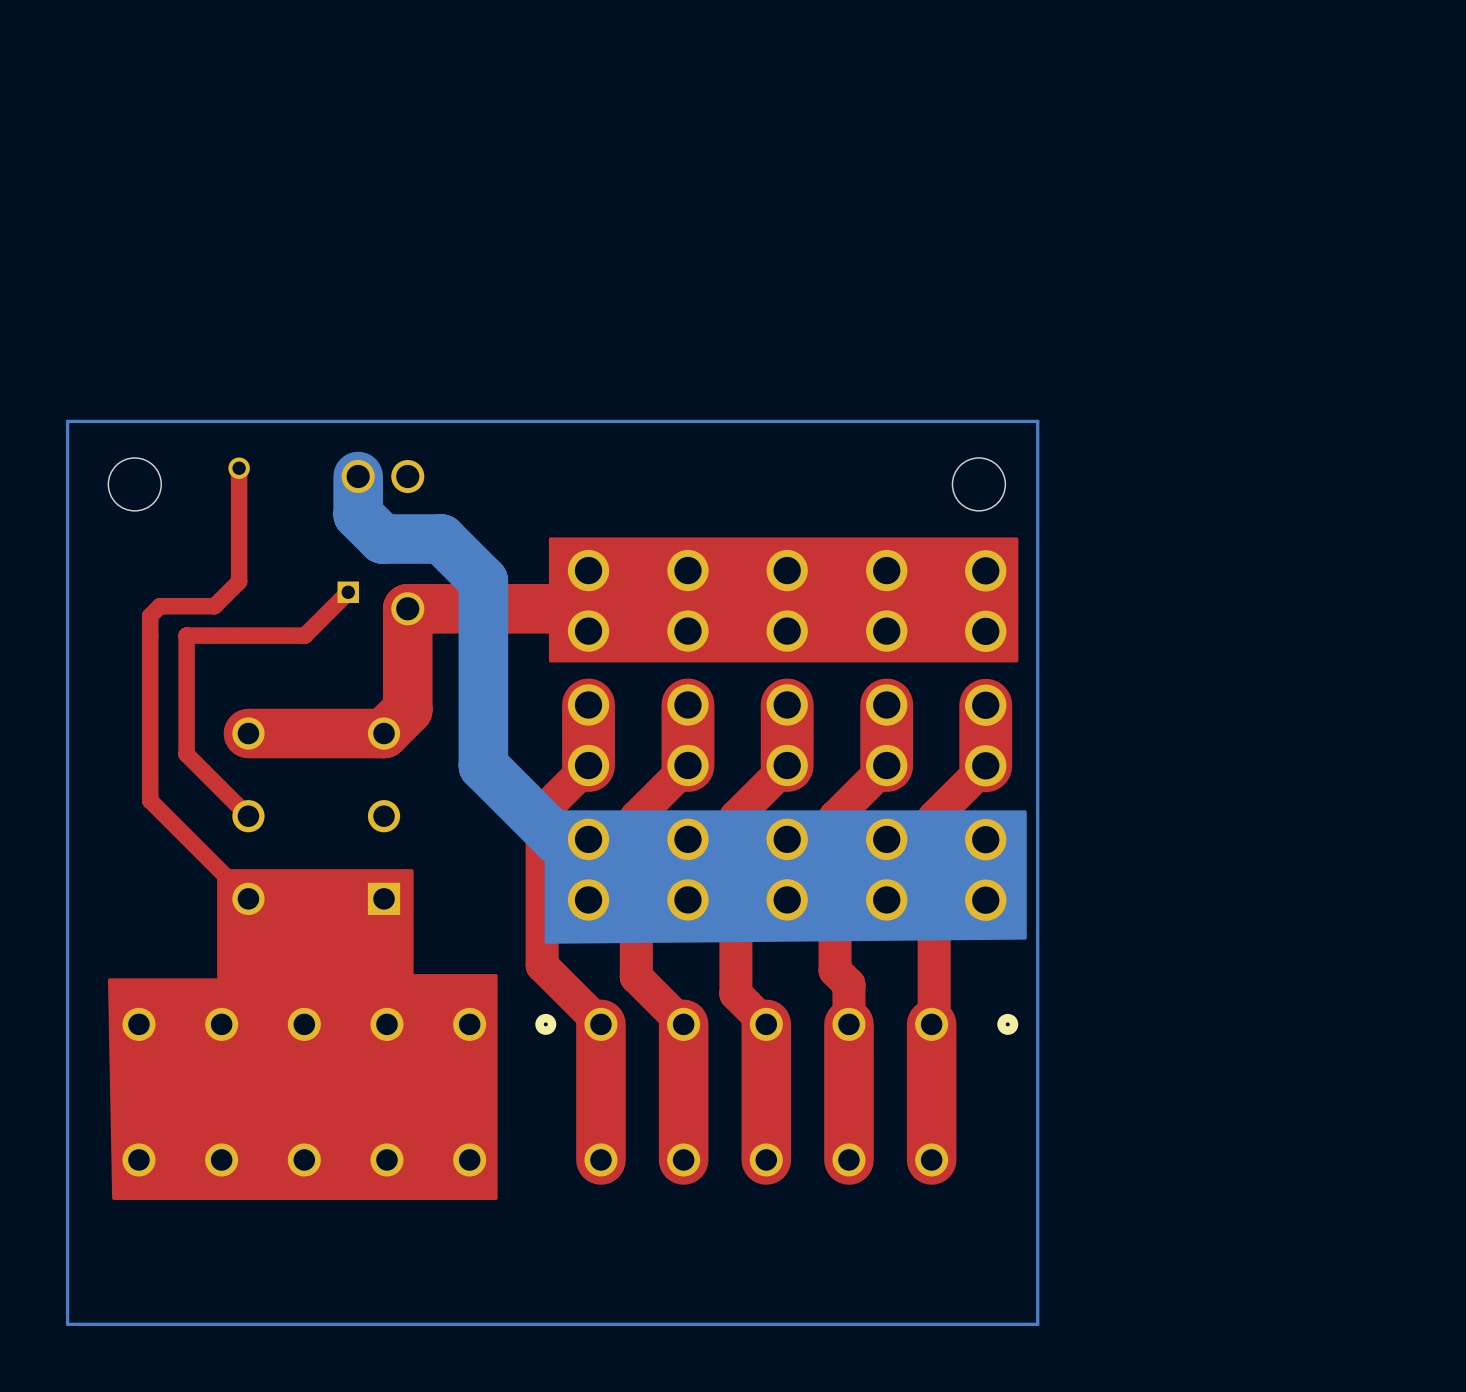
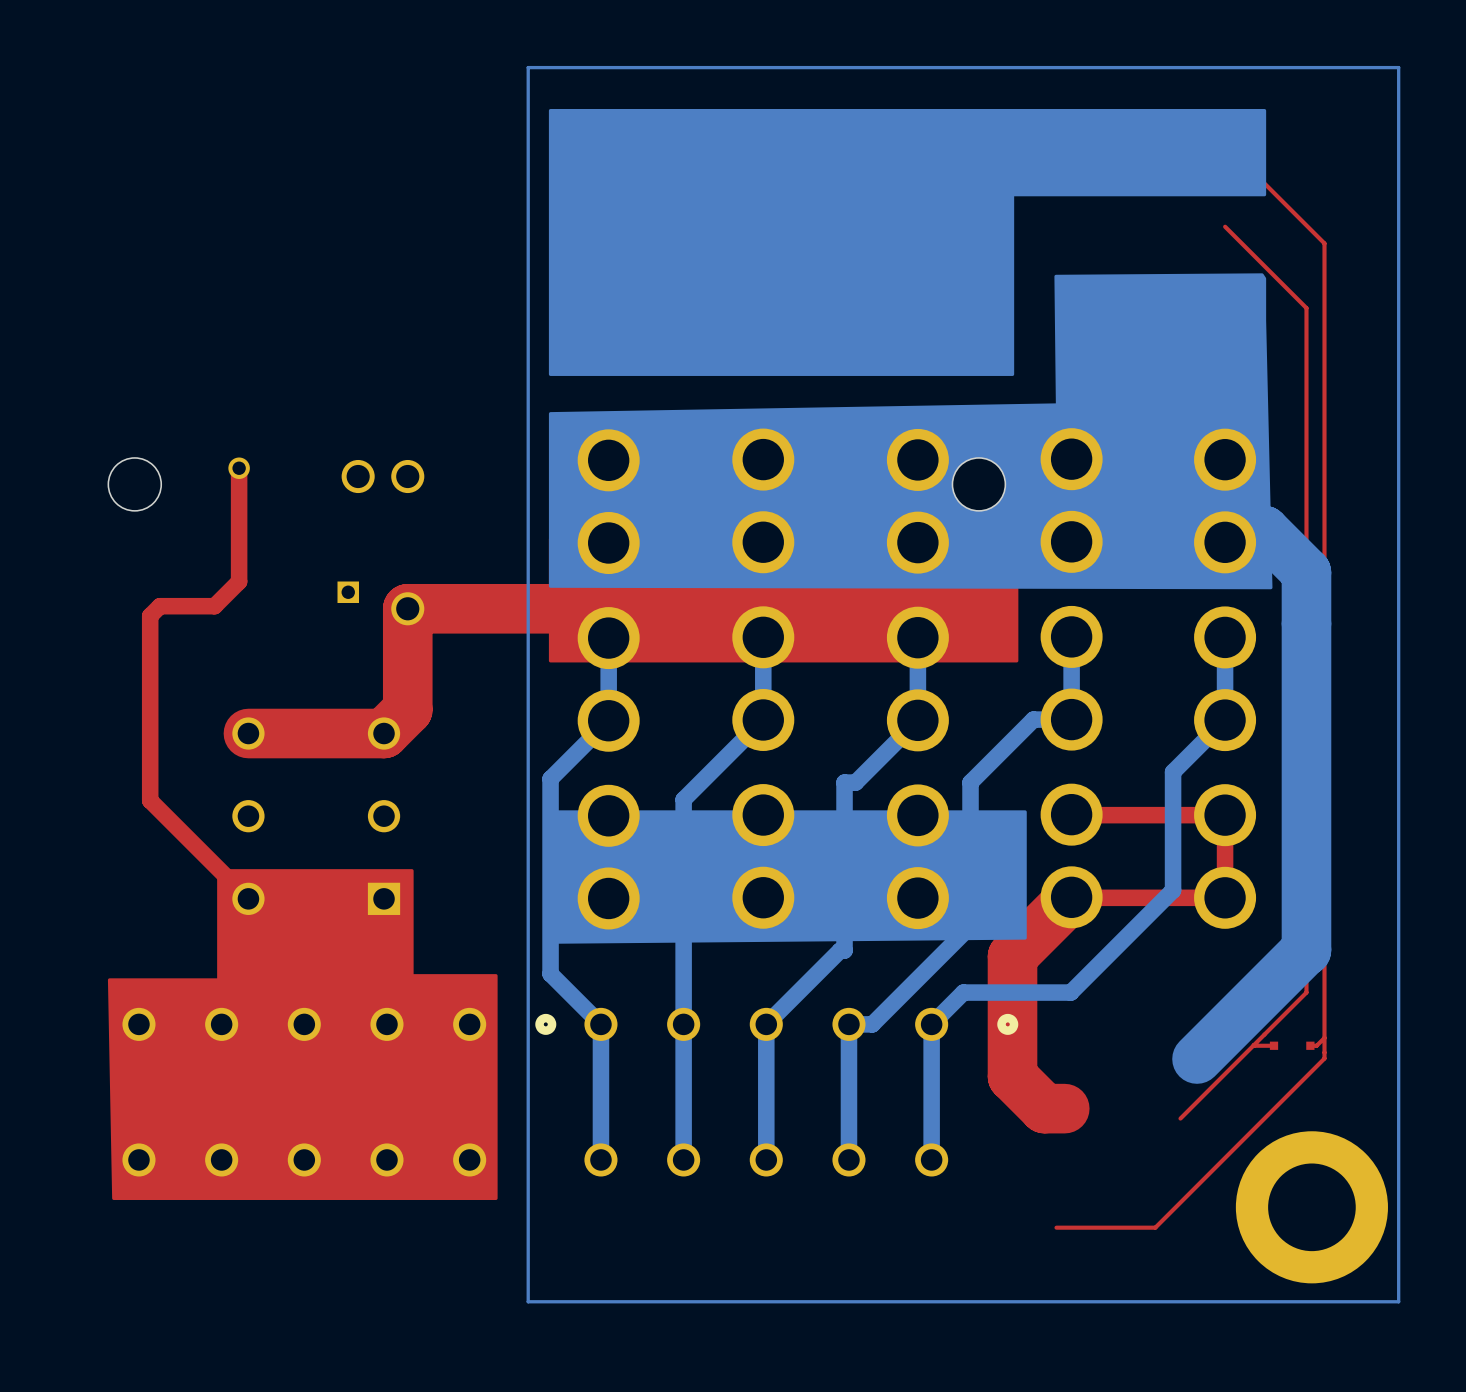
bottom track: none -> (1398, 67) (528, 67) (528, 1301) (1398, 1301) (1398, 67)
drawing: none -> [548, 108, 1273, 590]
top track: none -> (1225, 144) (1324, 243) (1324, 1058) (1155, 1227) (1056, 1227)
top track: none -> (1225, 226) (1306, 308) (1306, 992) (1180, 1118)
bottom track: (1037, 421) (67, 421) (67, 1324) (1037, 1324) (1037, 421) -> none
bottom track: (358, 476) (358, 514) (382, 539) (441, 539) (483, 581) (483, 765) (556, 839) (886, 839) -> none
bottom track: none -> (1225, 542) (1236, 530) (1264, 530) (1306, 572) (1306, 950)
top track: (348, 592) (304, 635) (186, 635) (186, 754) (248, 816) -> none
bottom track: none -> (1301, 619) (1306, 623) (1306, 949) (1197, 1059)
bottom track: none -> (1071, 636) (1071, 719) (1033, 719) (970, 782) (970, 926) (872, 1024) (848, 1024) (848, 1159)
bottom track: none -> (763, 637) (763, 719) (683, 799) (683, 1159)
bottom track: none -> (917, 637) (917, 720) (855, 782) (844, 782) (844, 950) (840, 950) (766, 1024) (766, 1159)
bottom track: none -> (1225, 637) (1225, 720) (1173, 772) (1173, 890) (1070, 992) (963, 992) (931, 1024) (931, 1157)
bottom track: none -> (608, 638) (608, 720) (550, 778) (550, 973) (600, 1024) (600, 1159)
part: none -> (763, 678)
part: none -> (1071, 678)
part: none -> (1225, 678)
part: none -> (608, 679)
part: none -> (917, 679)
top track: (687, 704) (687, 765) (636, 817) (636, 977) (683, 1024) (683, 1159) -> none
top track: (787, 704) (787, 765) (735, 816) (735, 993) (766, 1024) (766, 1159) -> none
top track: (588, 705) (588, 765) (542, 811) (542, 965) (600, 1024) (600, 1159) -> none
top track: (886, 705) (886, 765) (835, 817) (835, 970) (848, 984) (848, 1159) -> none
top track: (985, 705) (985, 765) (934, 817) (934, 1021) (931, 1024) (931, 1159) -> none
part: (588, 735) -> none
part: (687, 735) -> none
part: (787, 735) -> none
part: (886, 735) -> none
part: (985, 735) -> none
top track: none -> (1071, 814) (1225, 815) (1225, 897) (1071, 897) (1012, 956) (1012, 1076) (1044, 1108) (1064, 1108)
top track: none -> (1324, 1037) (1316, 1045) (1310, 1045)
top track: none -> (1253, 1045) (1274, 1045)
part: none -> (1292, 1045)
part: none -> (1311, 1207)

